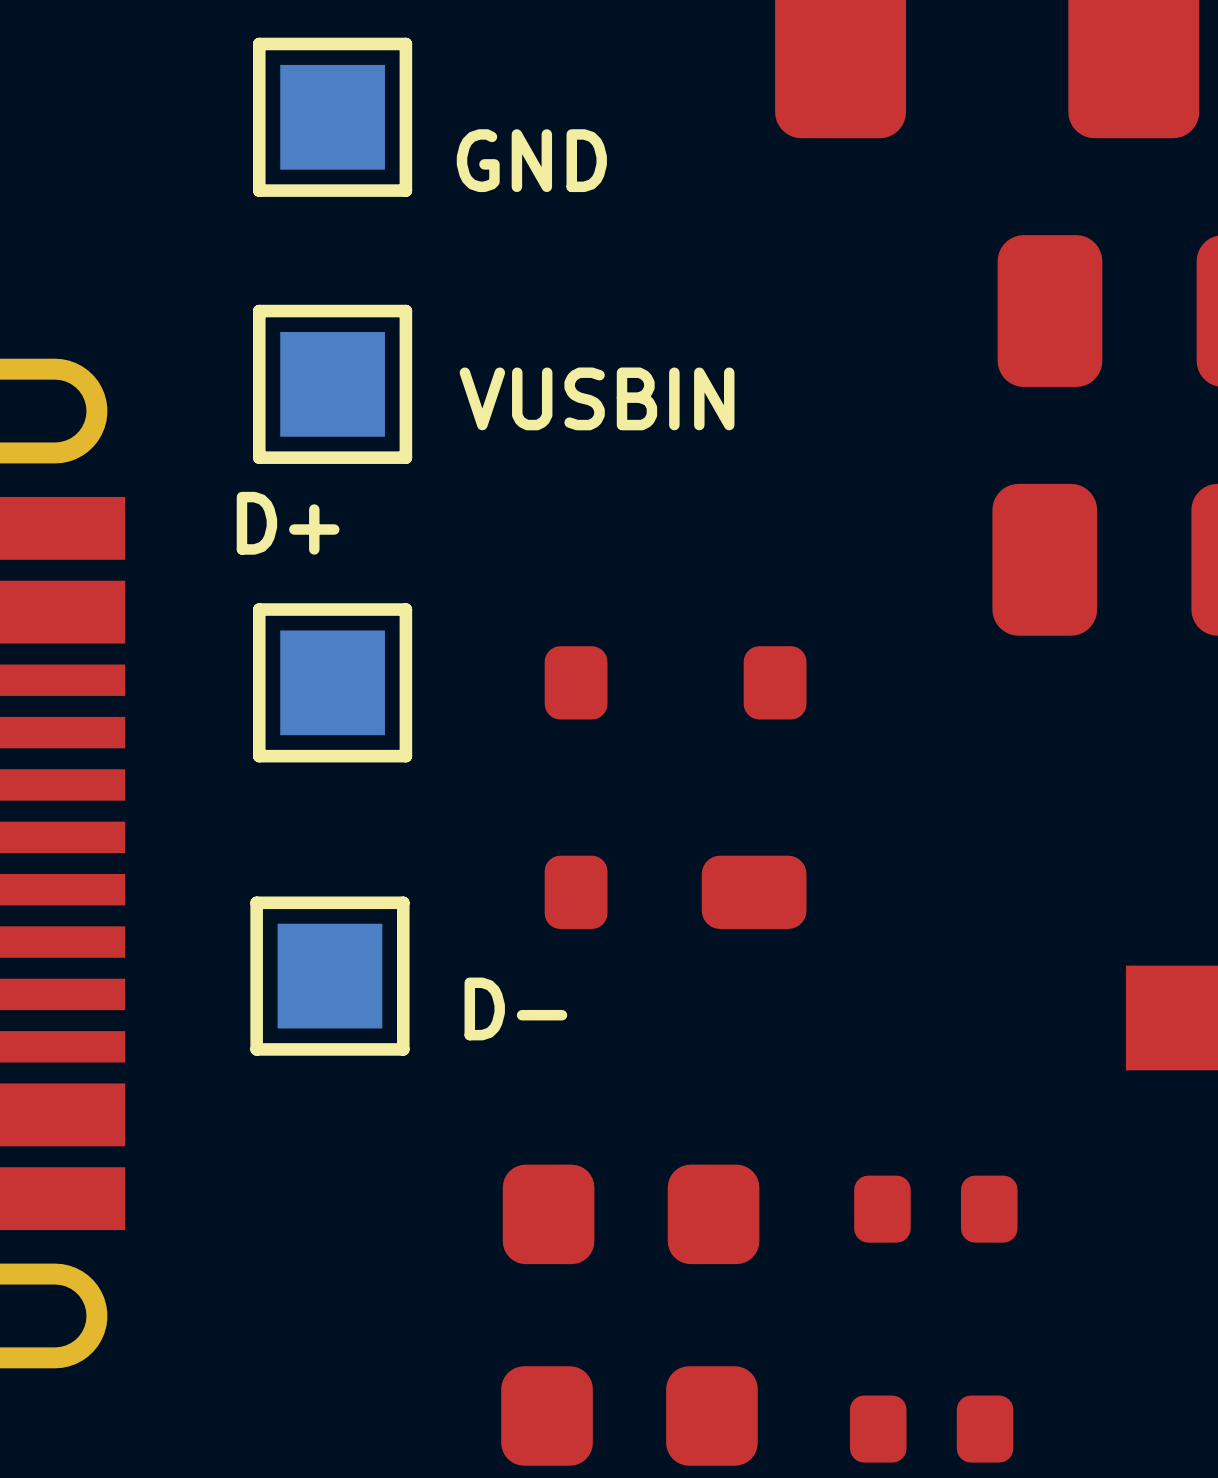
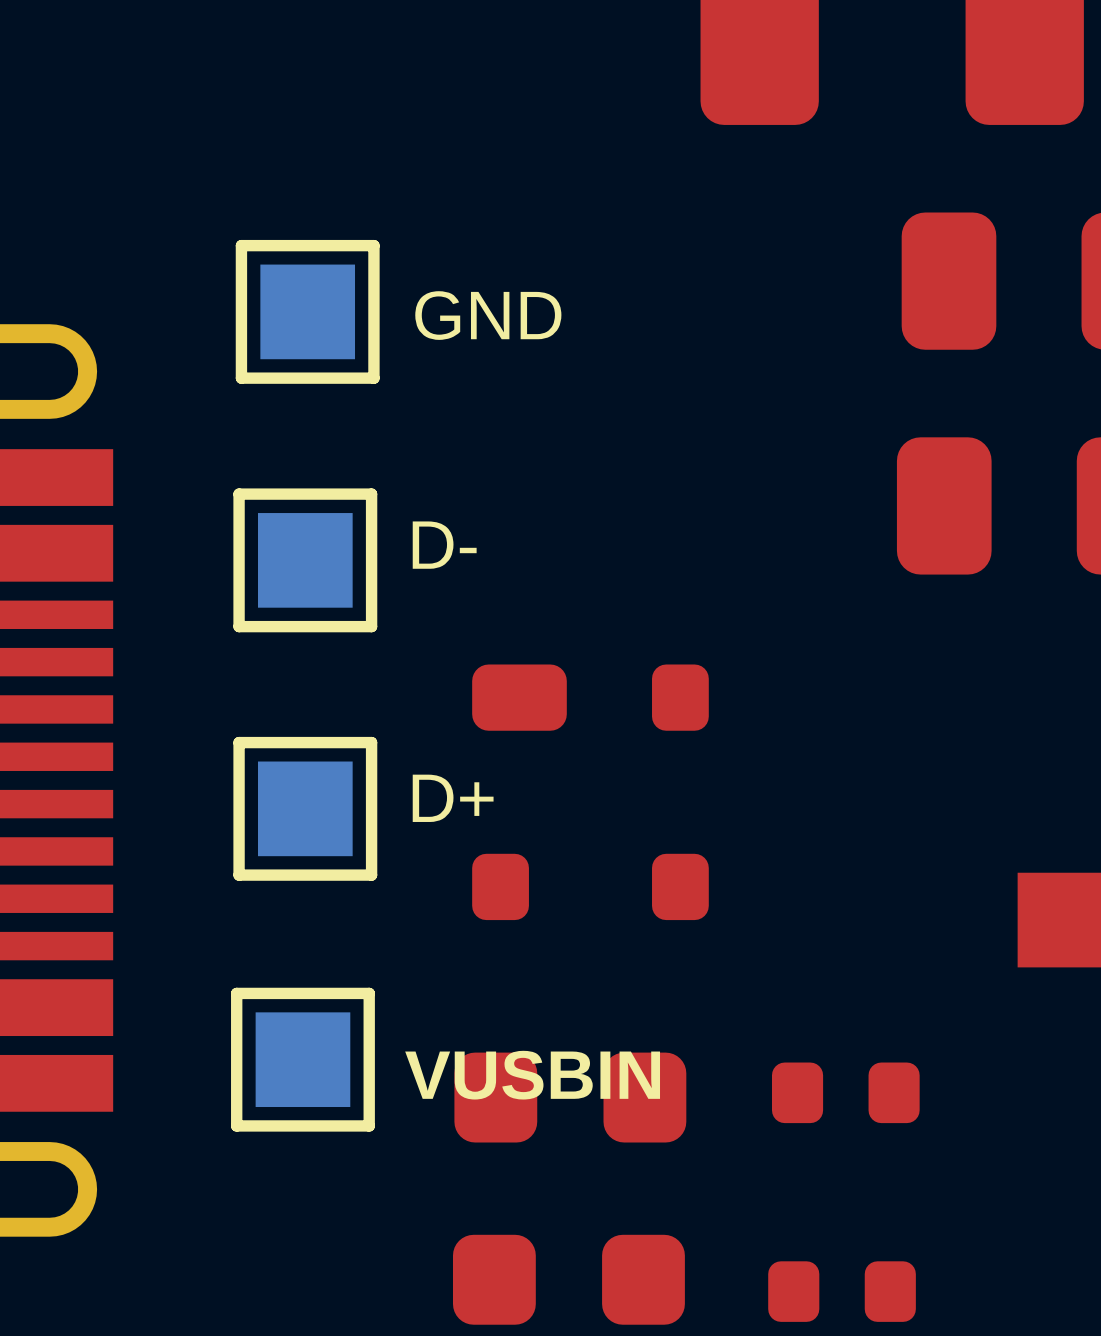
part position: (332, 117) -> (302, 1059)
text position: GND (531, 160) -> GND (488, 315)
part position: (332, 384) -> (307, 311)
text position: VUSBIN (597, 398) -> VUSBIN (532, 1075)
text position: D+ (288, 523) -> D+ (453, 798)
part position: (332, 682) -> (305, 560)
part rotation: 0° (675, 787) -> 180° (590, 792)
part position: (329, 976) -> (305, 808)
text position: D- (515, 1008) -> D- (444, 545)

